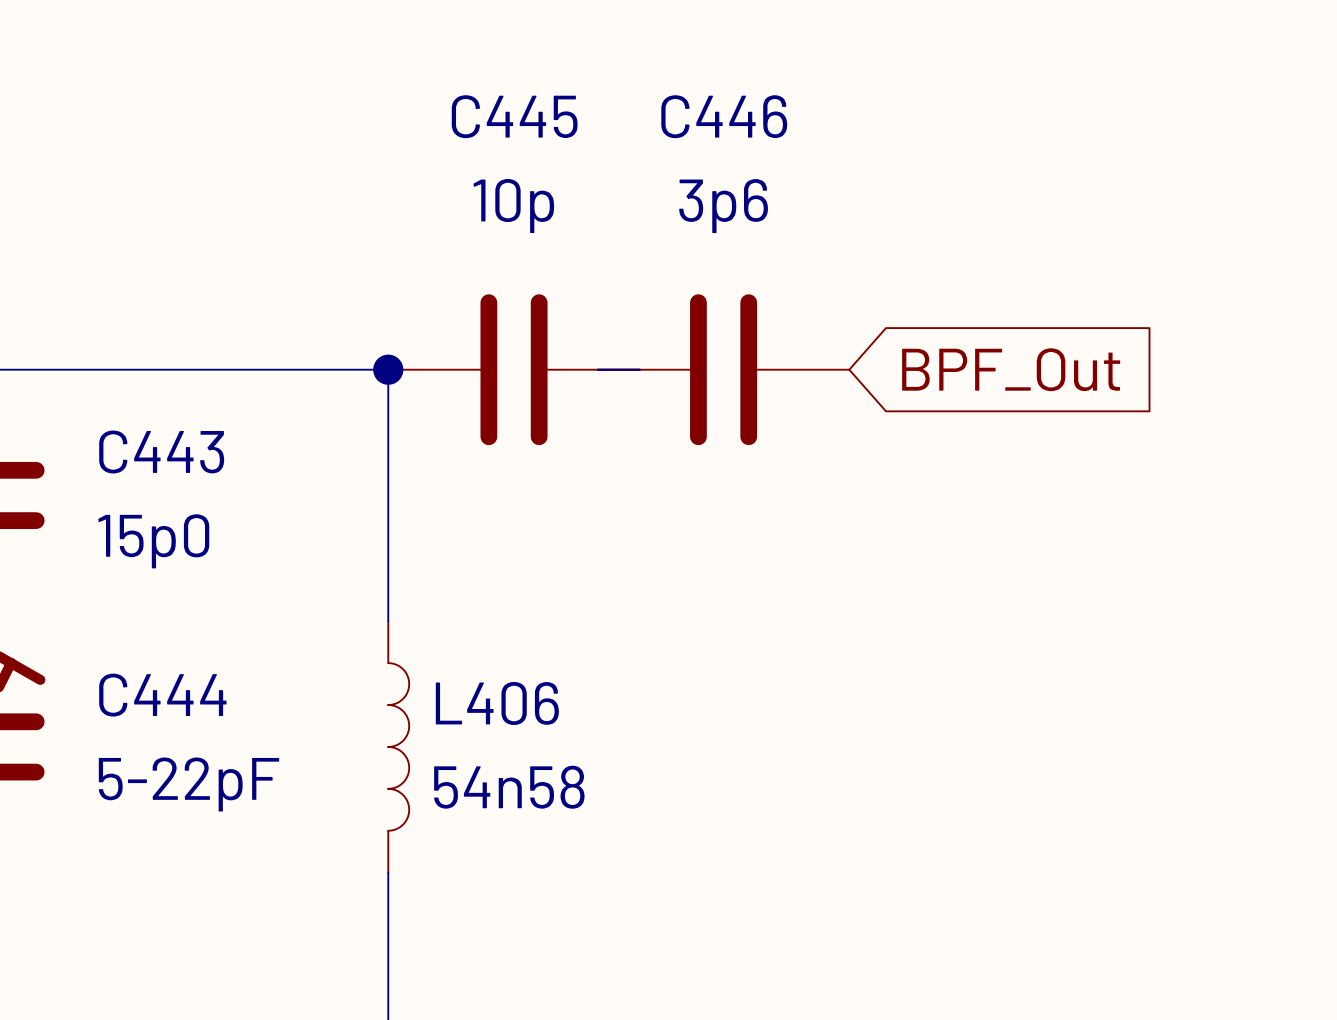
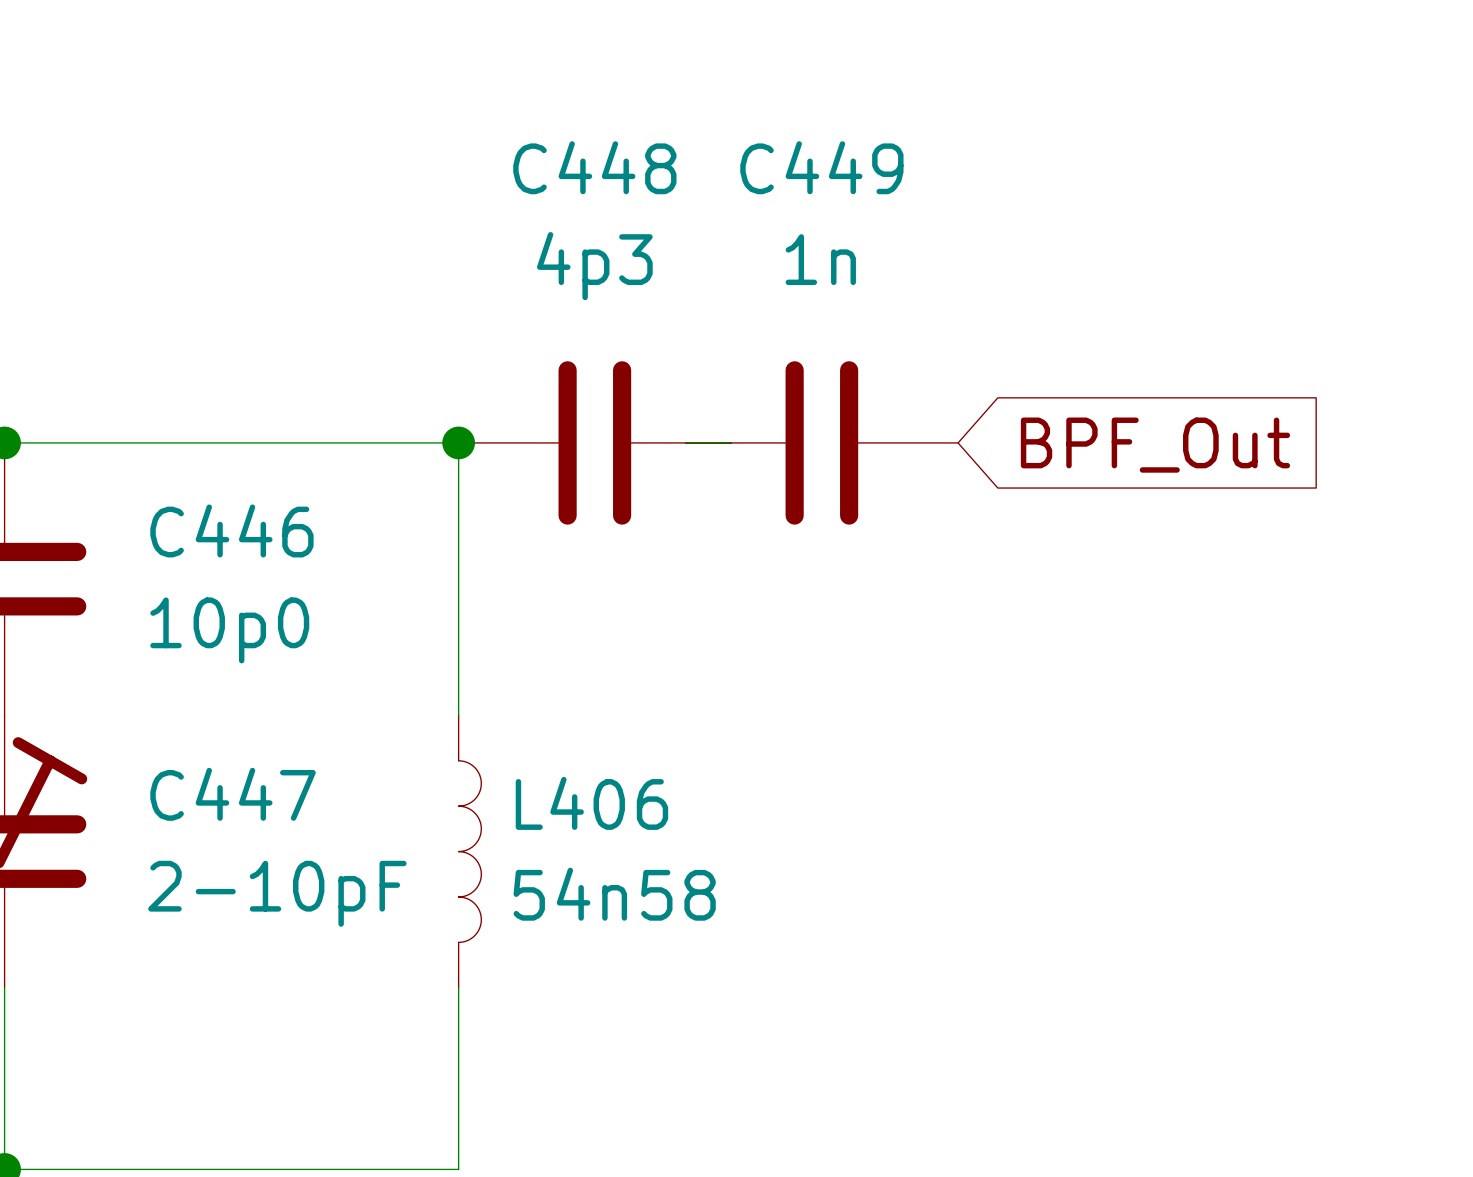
C445 name: C445 (514, 116) -> C448 (594, 167)
C446 name: C446 (724, 116) -> C449 (821, 167)
C445 value: 10p (513, 206) -> 4p3 (594, 266)
C446 value: 3p6 (723, 206) -> 1n (820, 259)
C443 name: C443 (161, 452) -> C446 (231, 530)
C443 value: 15p0 (153, 541) -> 10p0 (229, 630)
C444 name: C444 (162, 695) -> C447 (233, 794)
C444 value: 5-22pF (188, 784) -> 2-10pF (277, 893)

